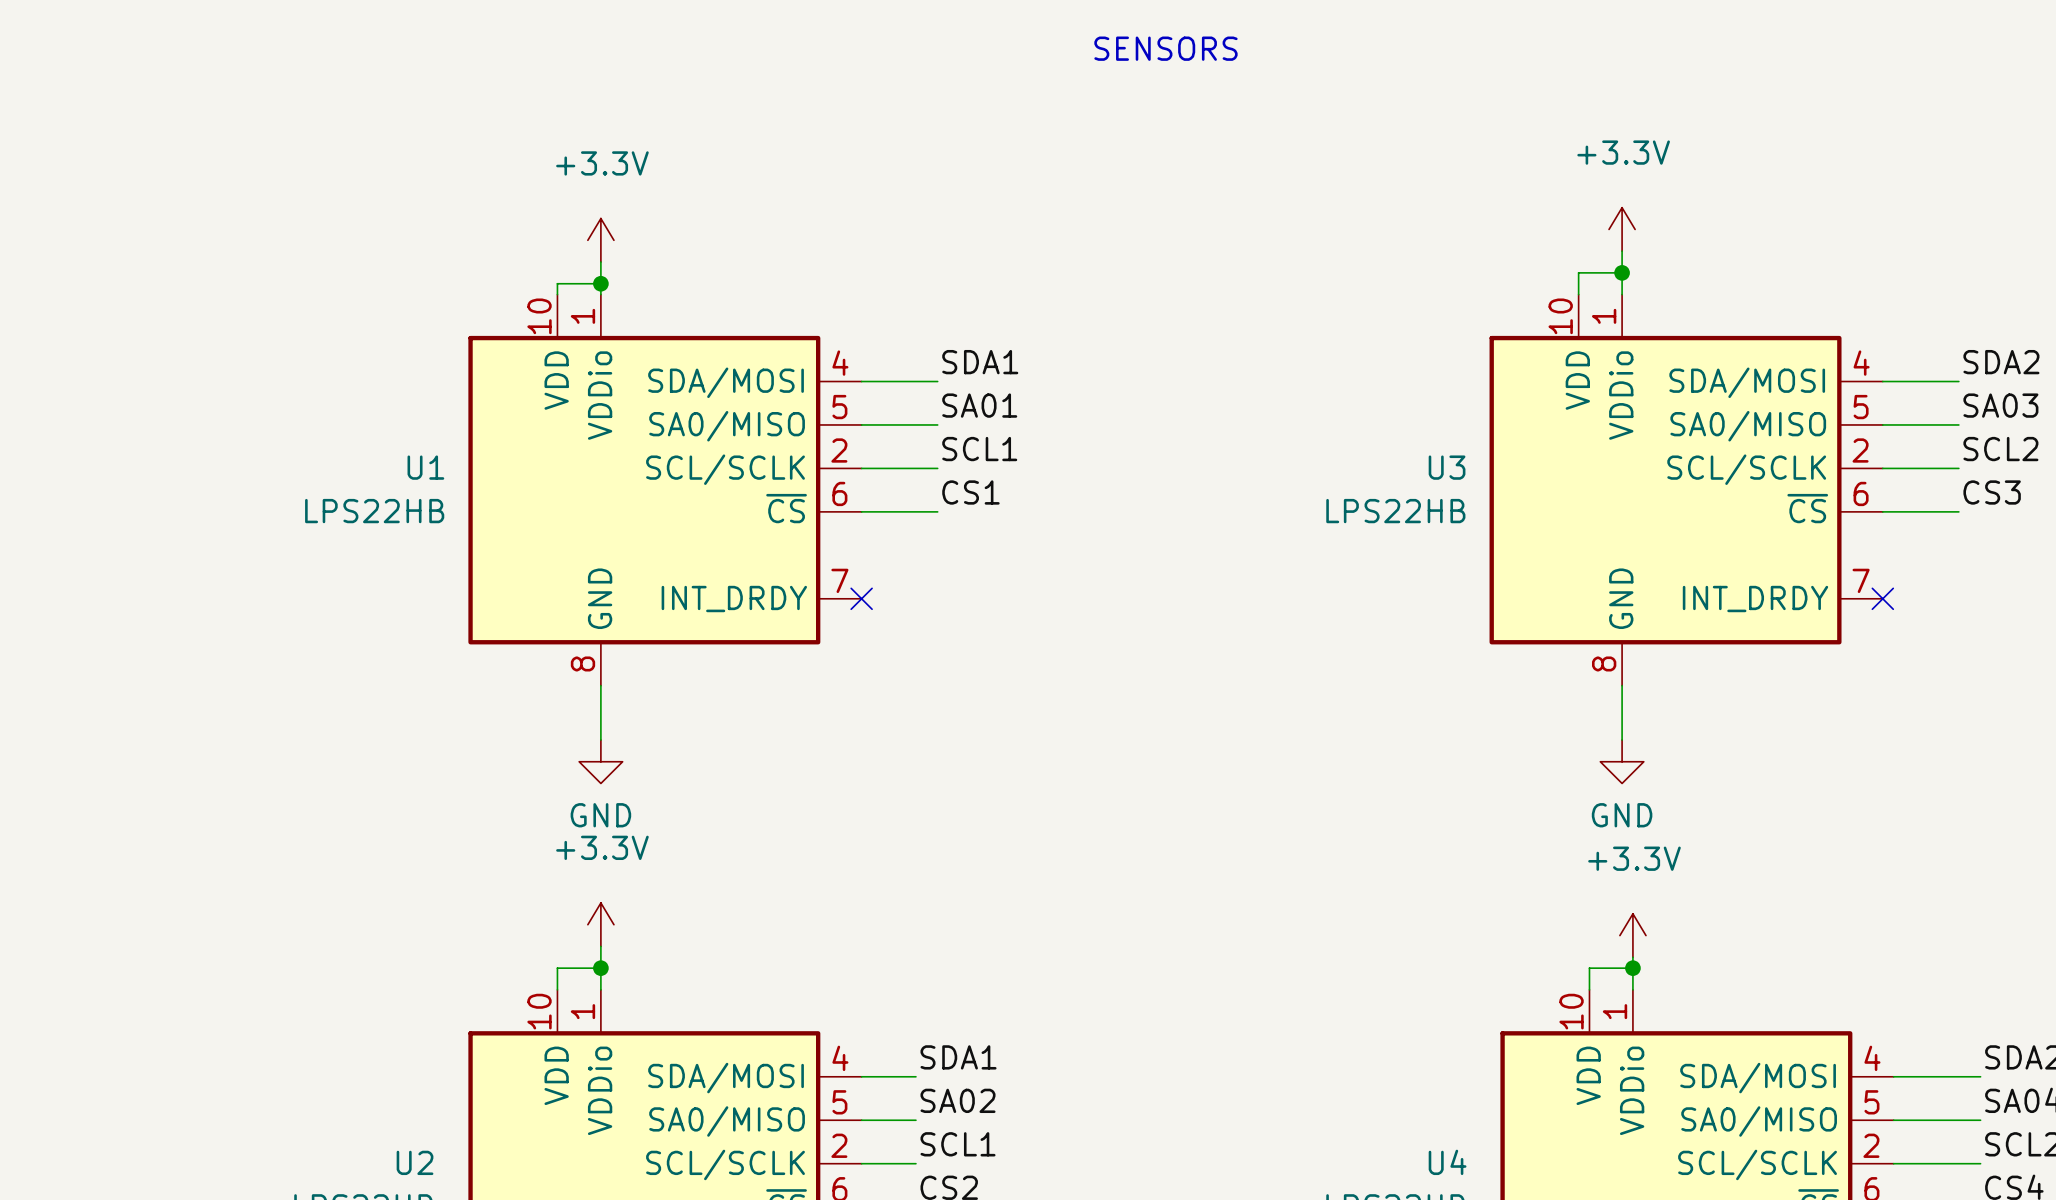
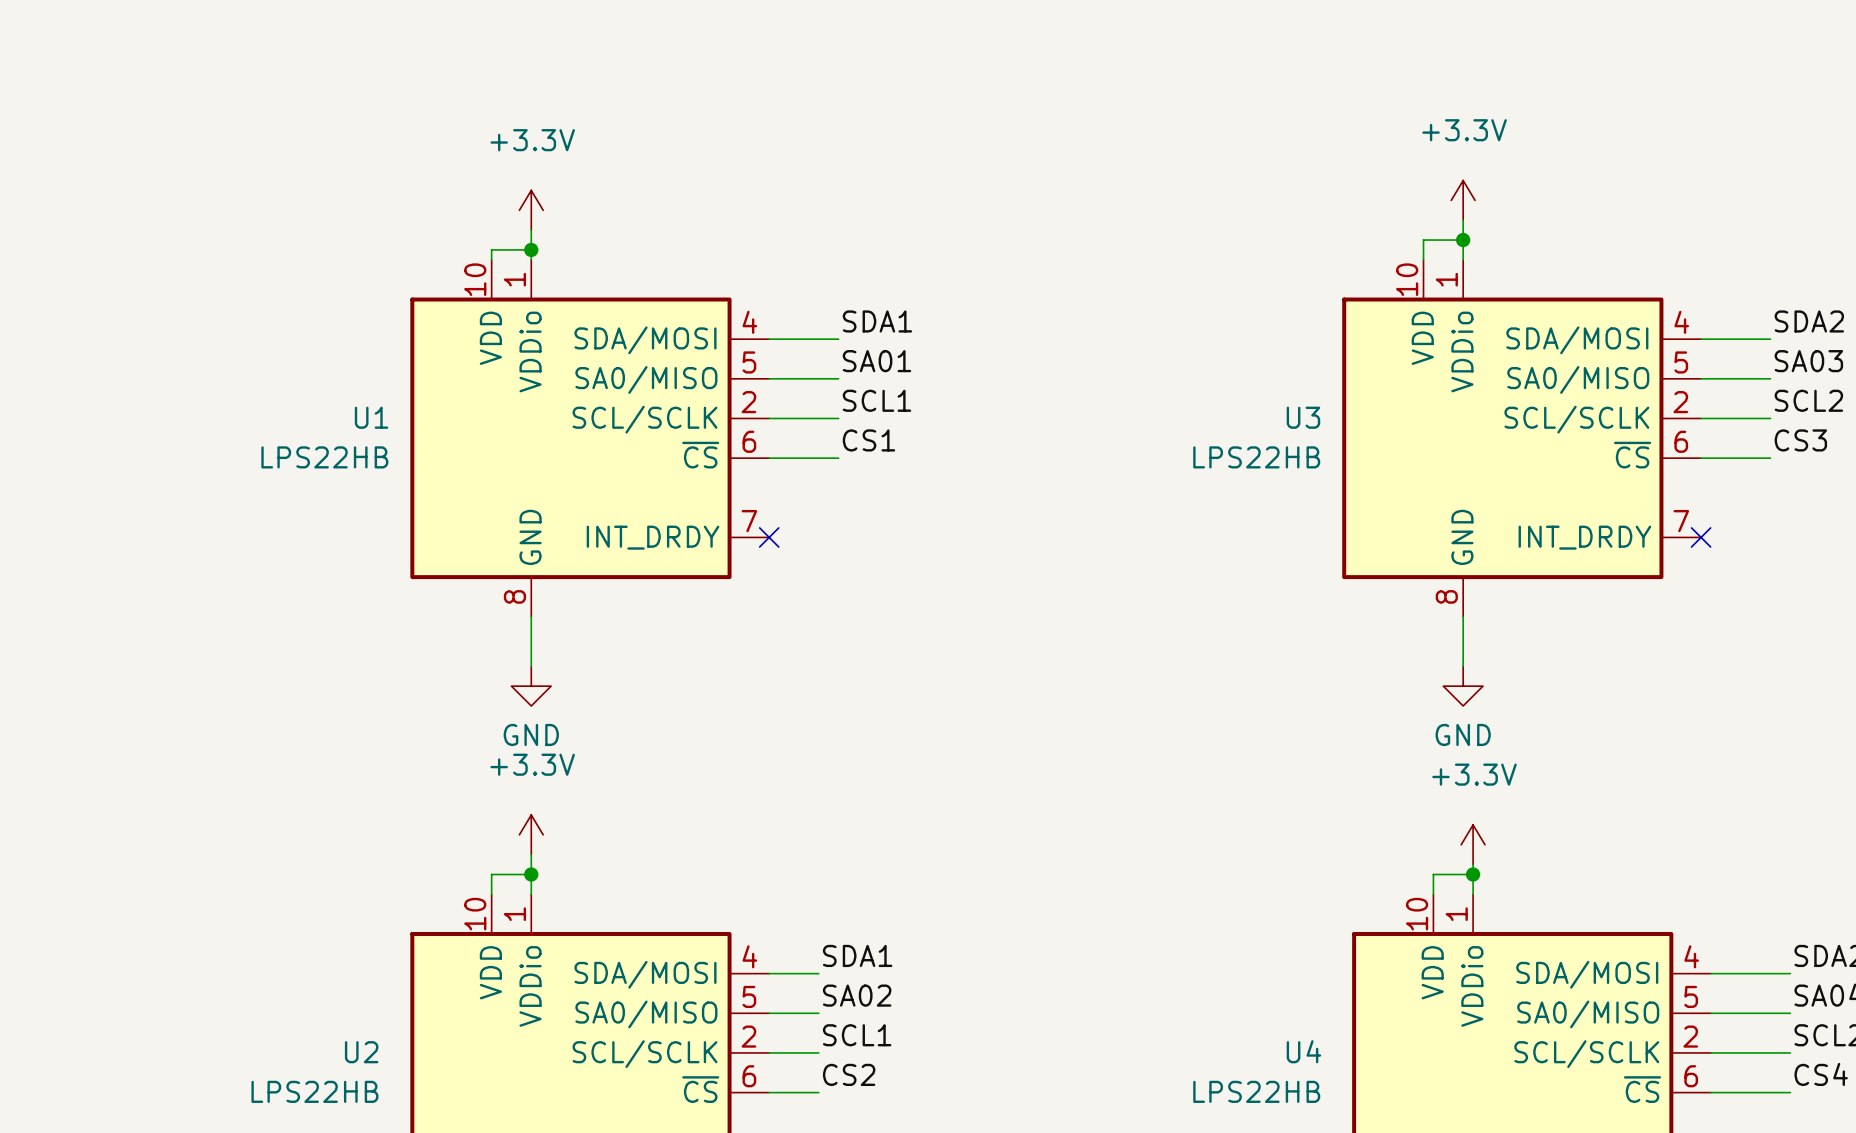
text: SENSORS (1165, 48) -> none

